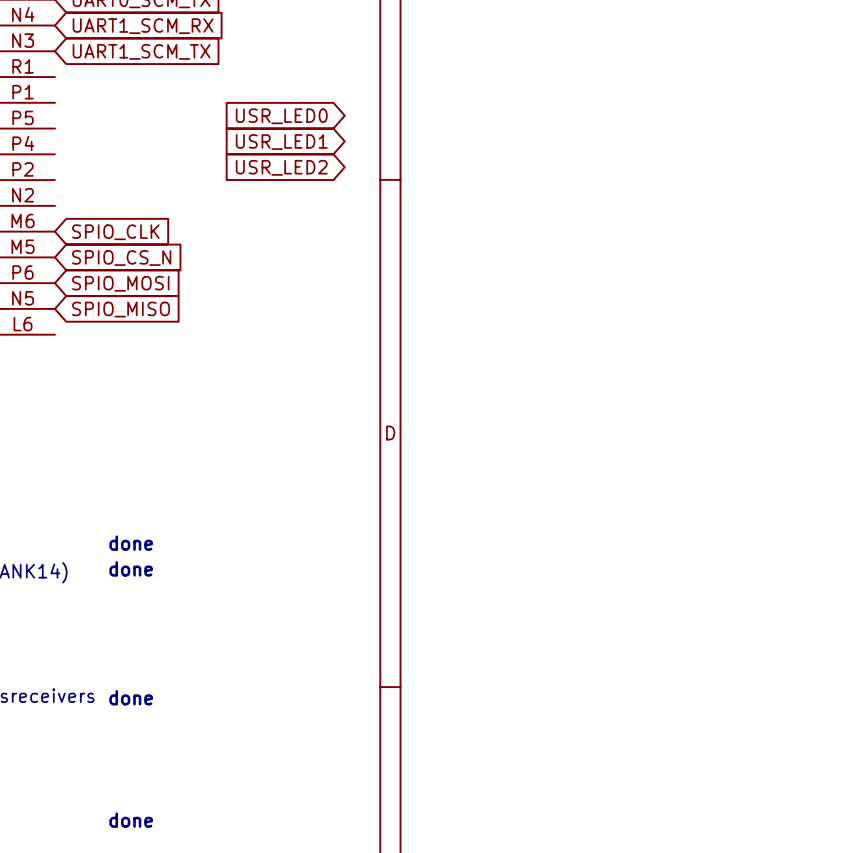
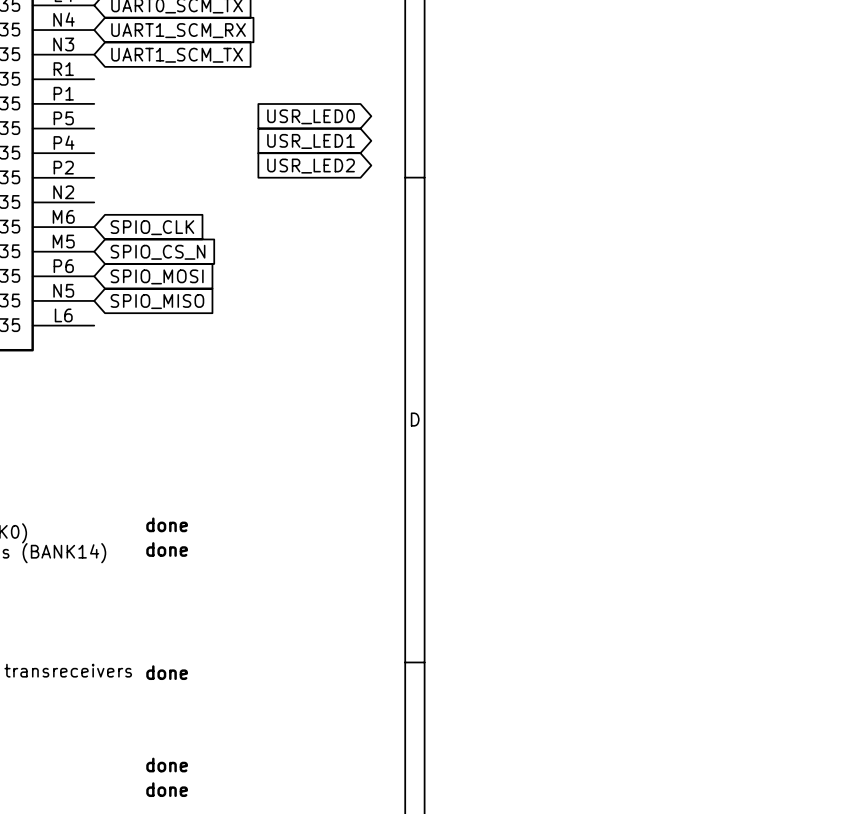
text: none -> done (167, 765)

